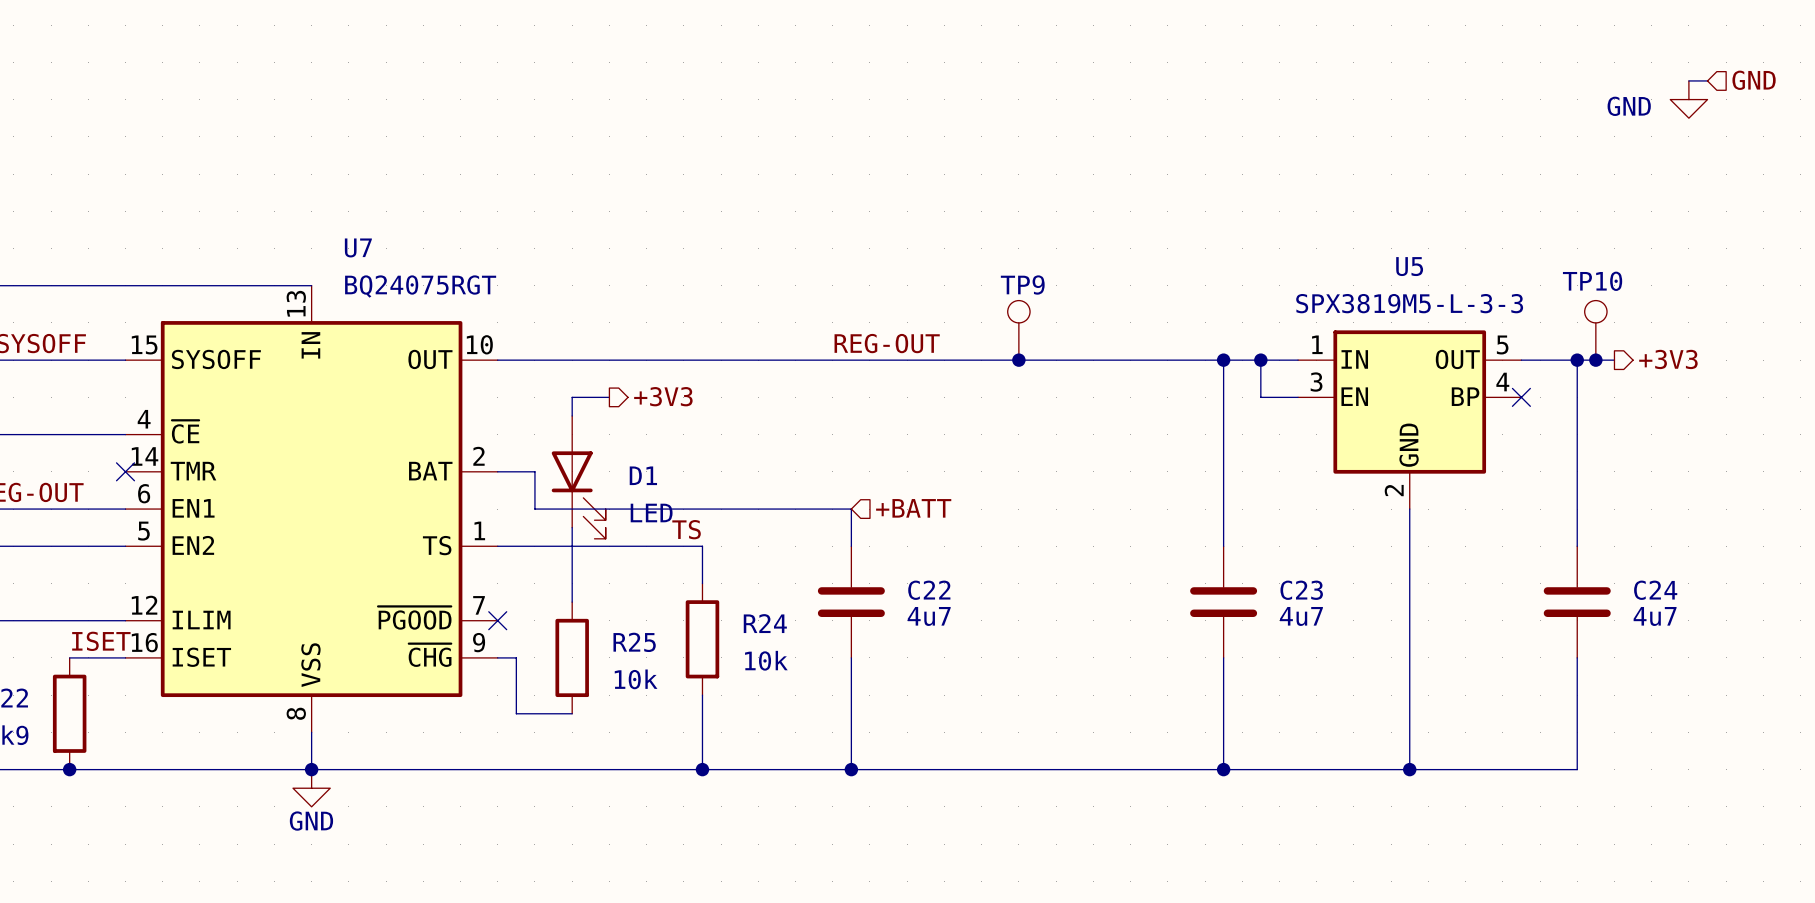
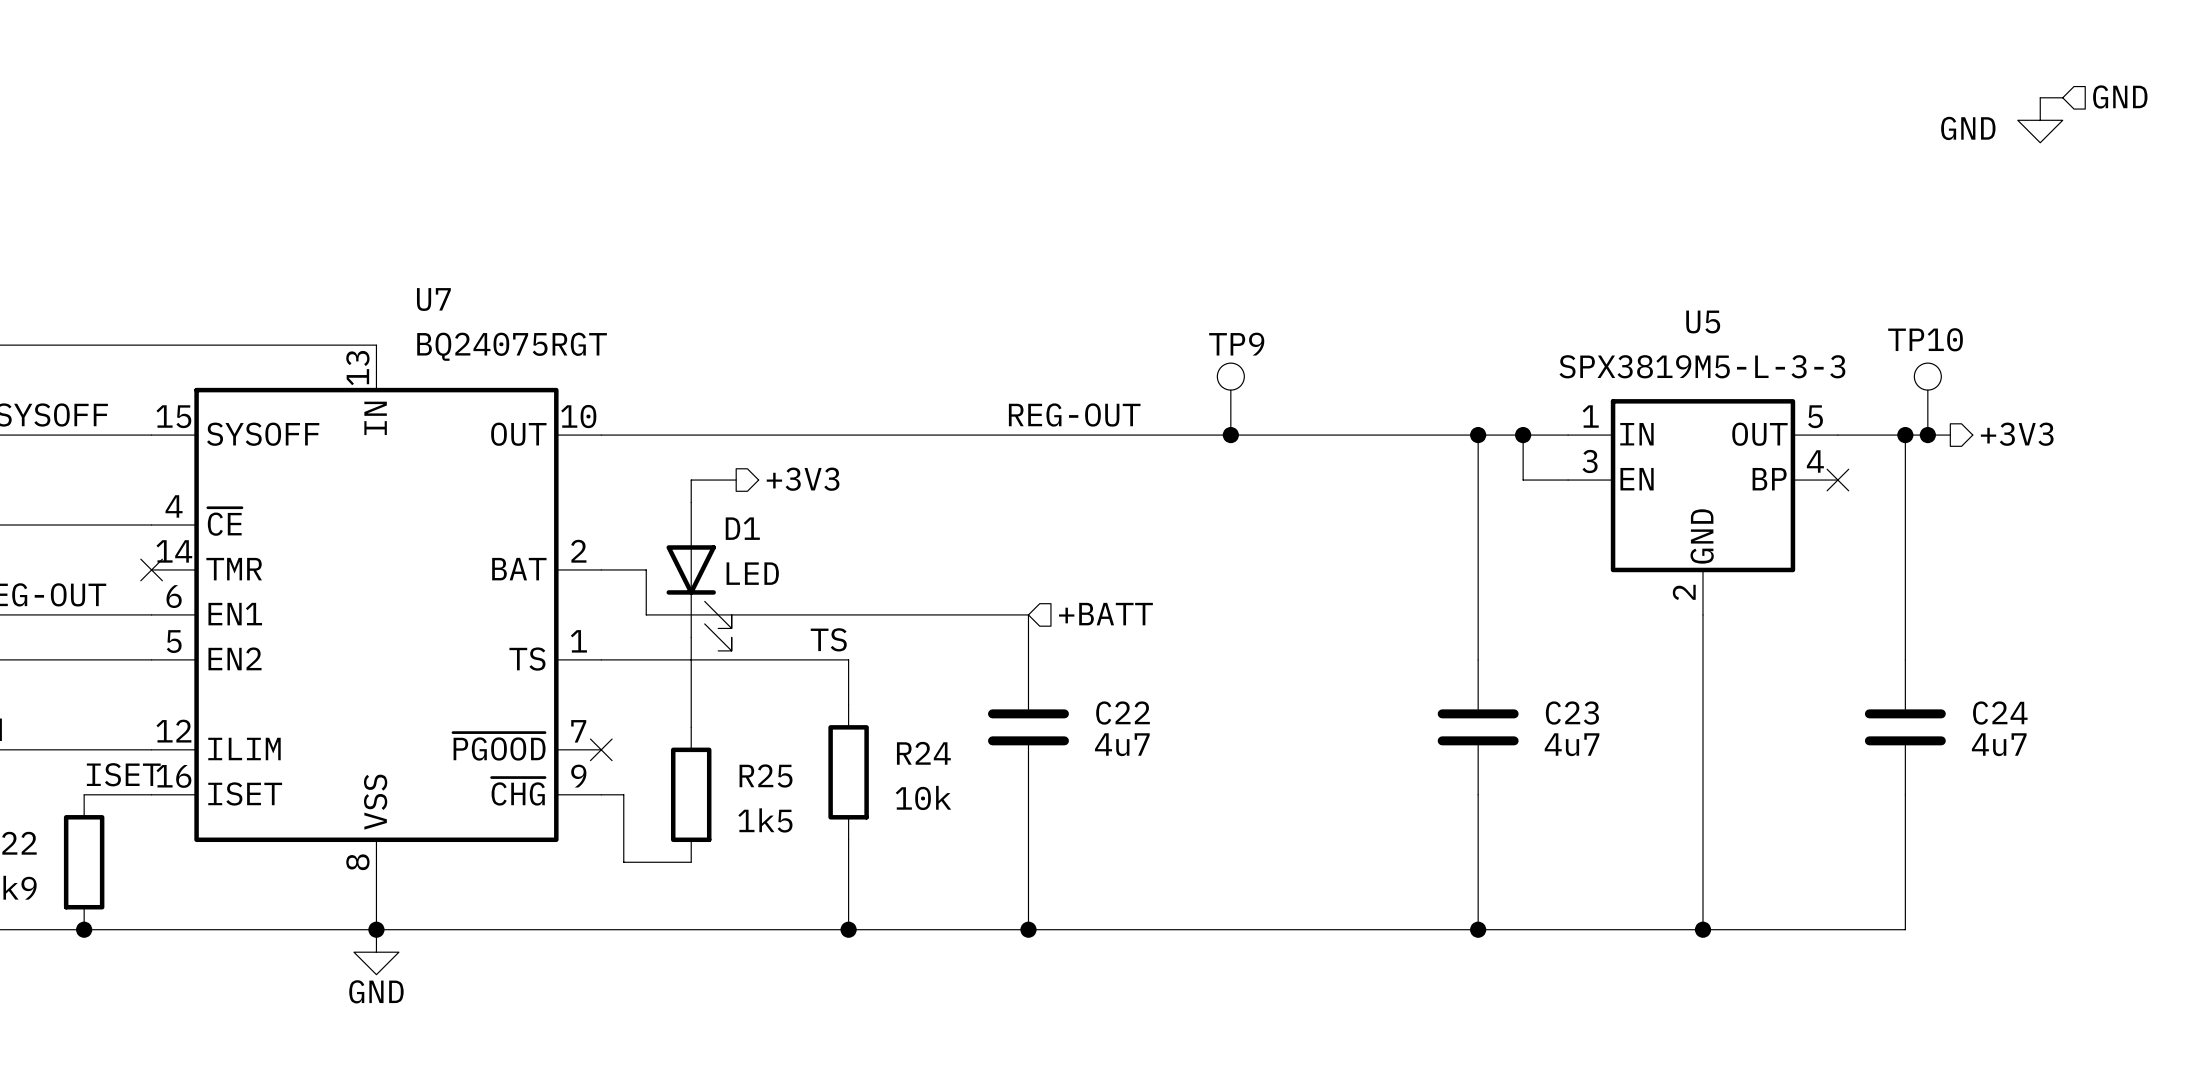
D1 name position: D1 (643, 475) -> D1 (742, 528)
D1 value position: LED (651, 513) -> LED (752, 573)
R25 value: 10k (636, 679) -> 1k5 (765, 820)

